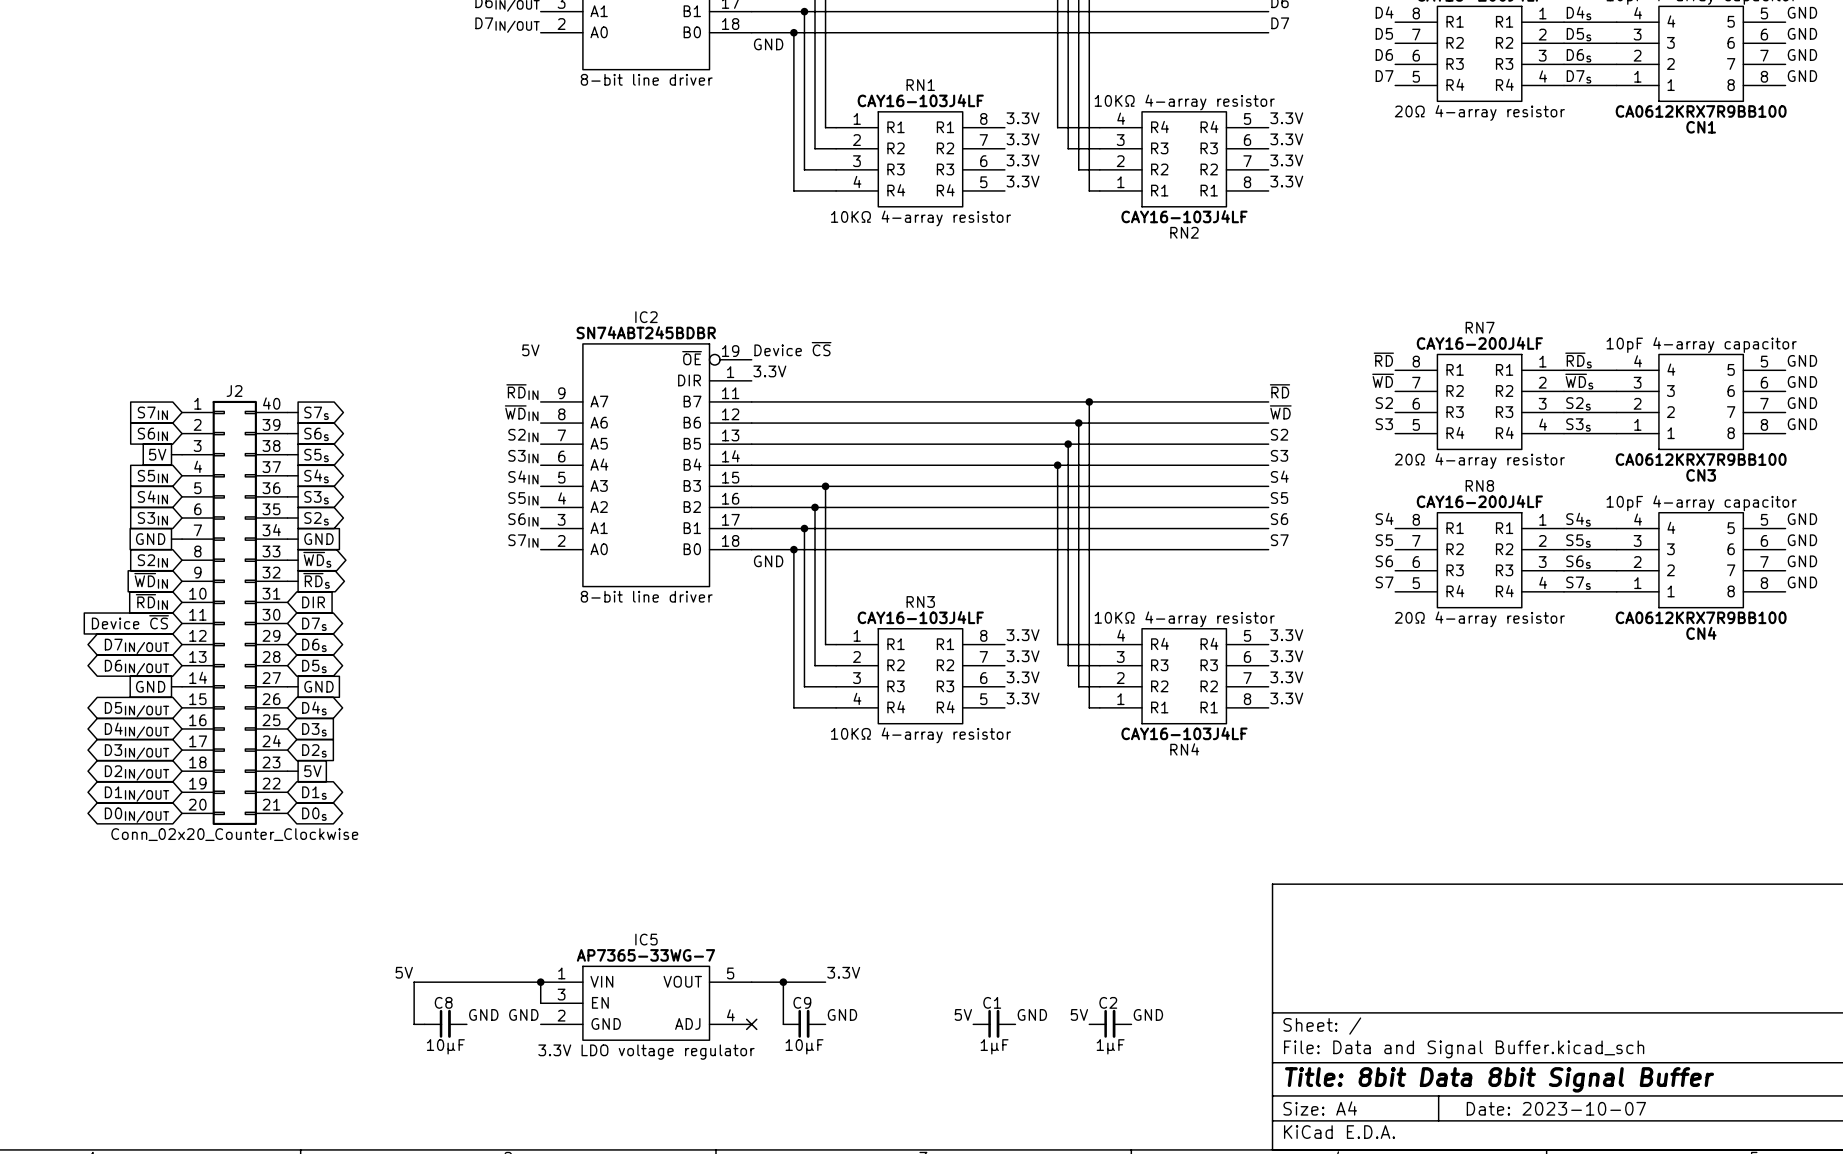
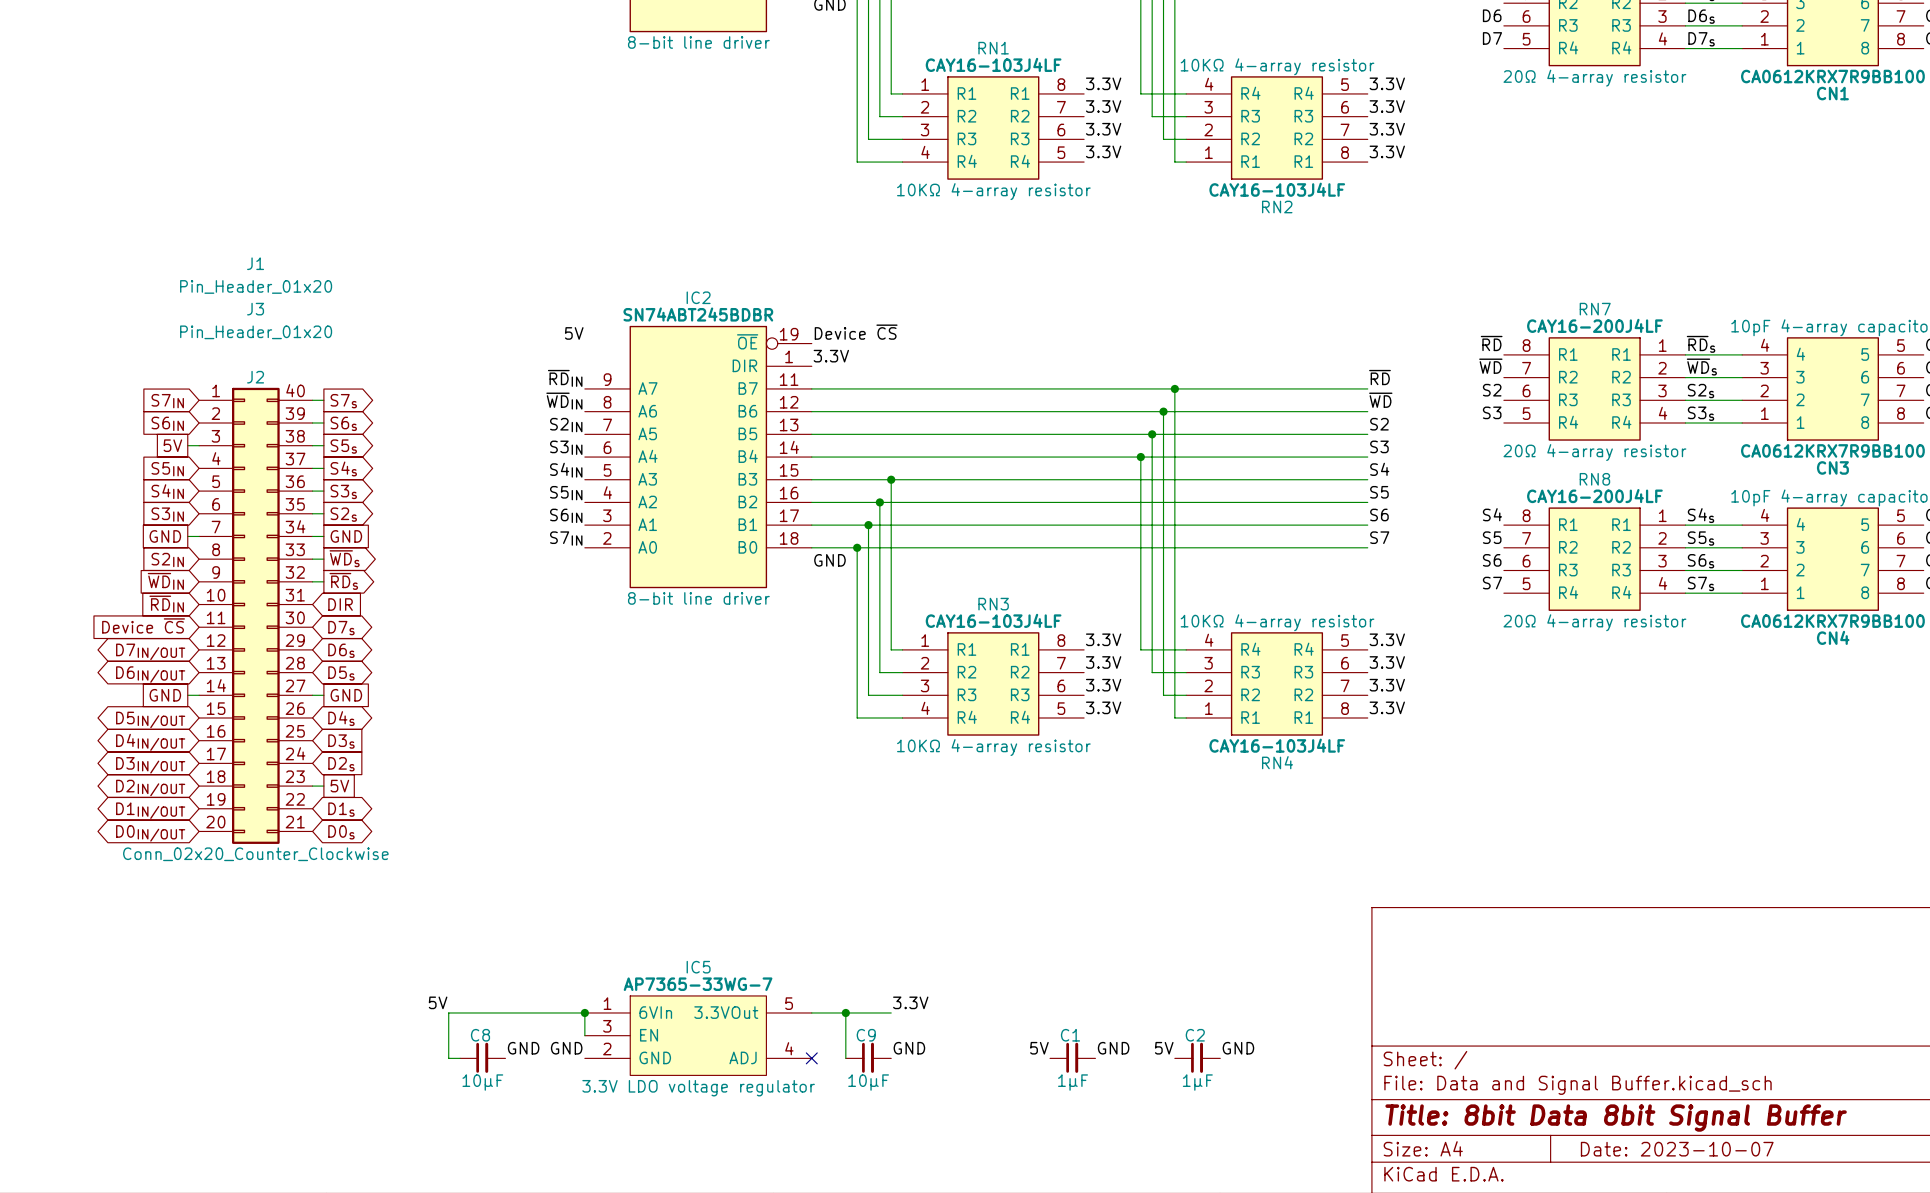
J1: none -> Pin_Header_01x20 (256, 275)
J3: none -> Pin_Header_01x20 (256, 321)
IC5 pin name: VIN (601, 981) -> 6VIn (655, 1012)
IC5 pin name: VOUT (682, 981) -> 3.3VOut (726, 1012)

